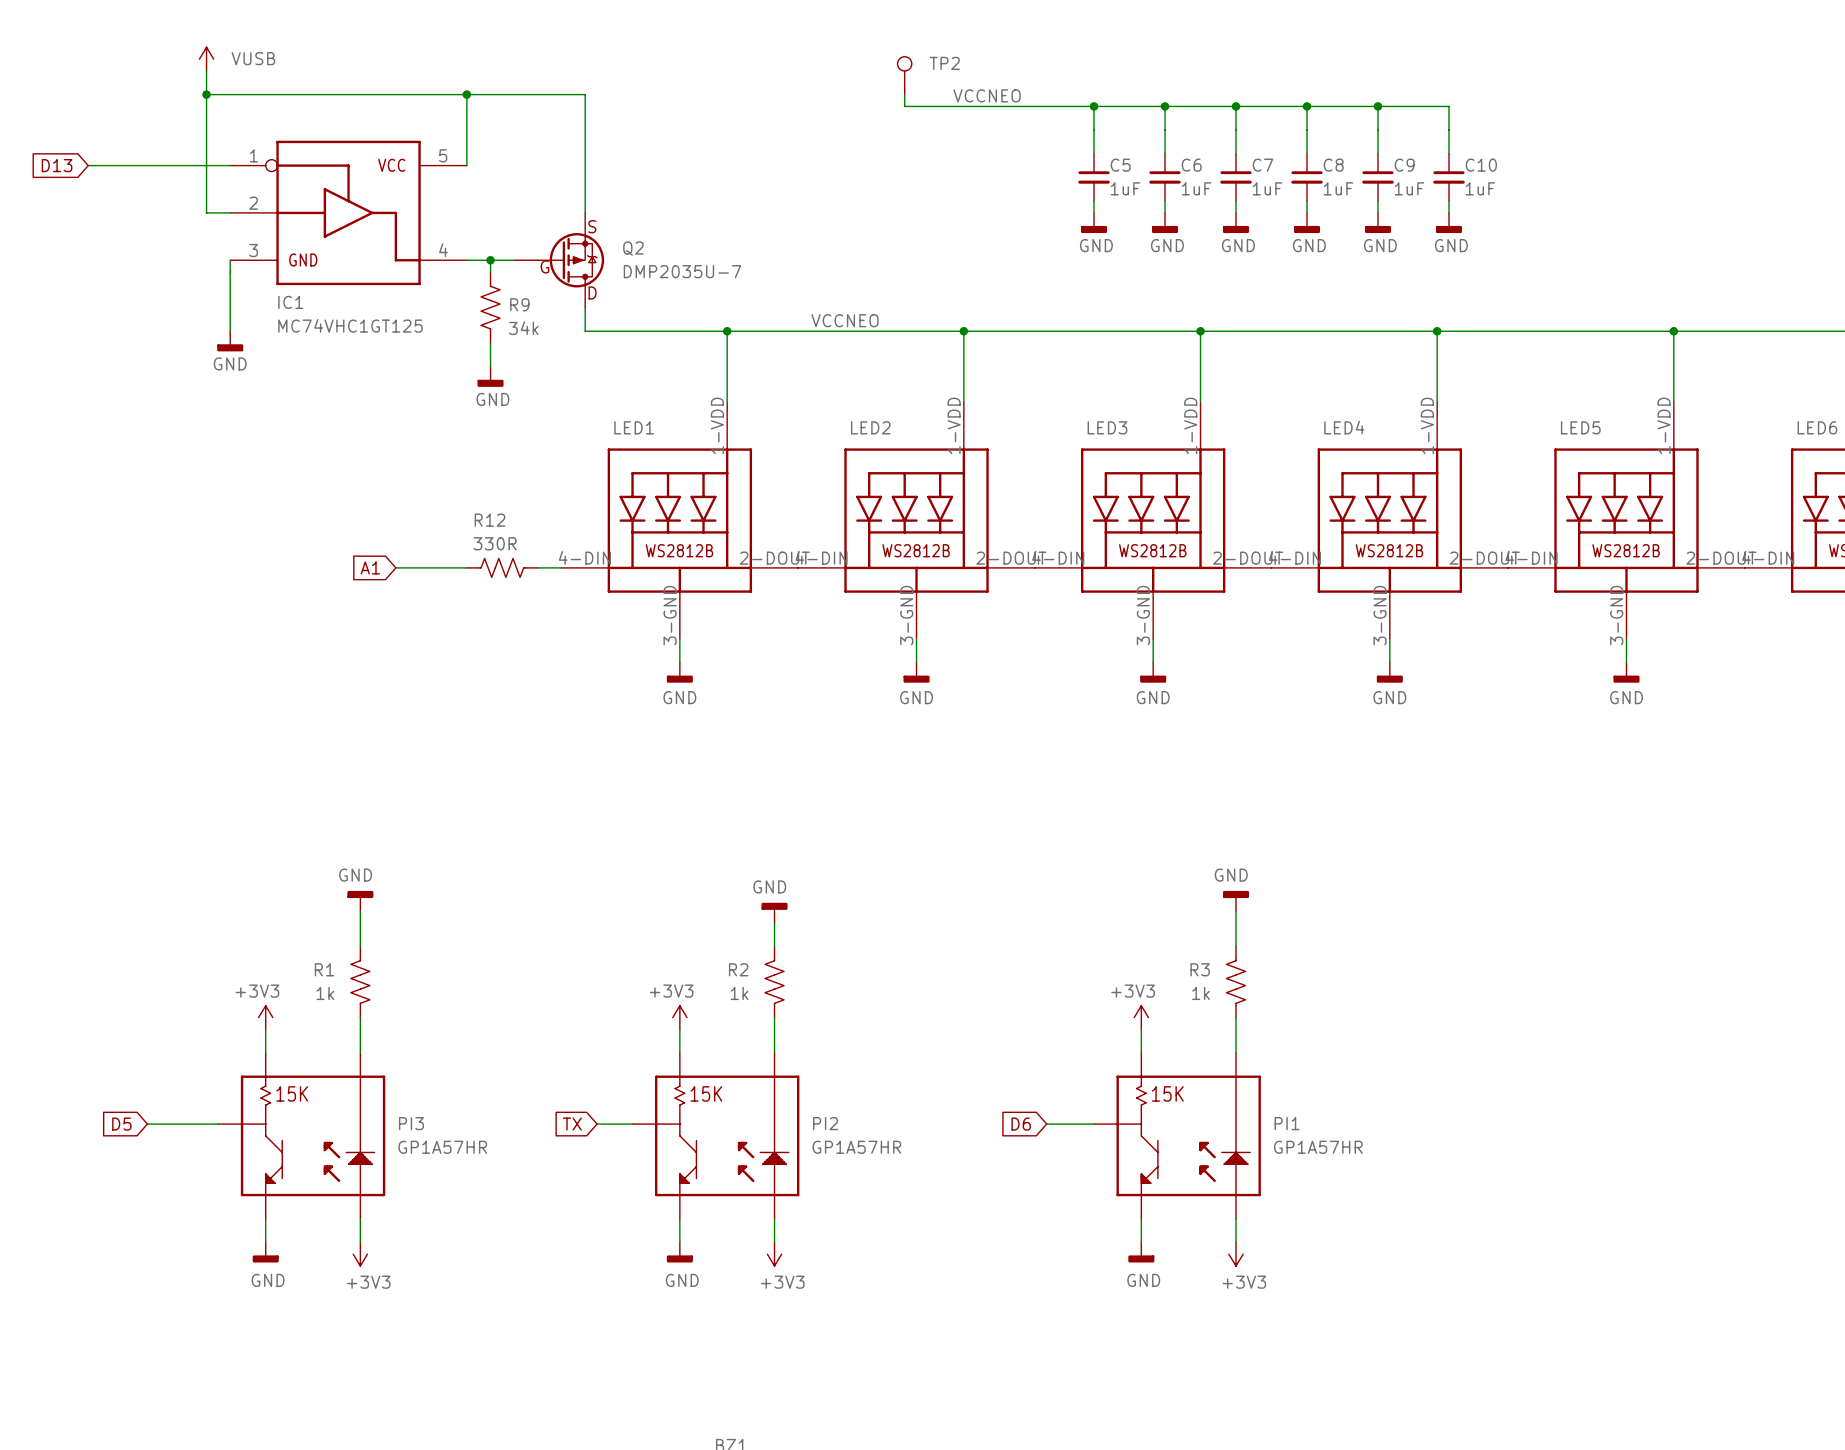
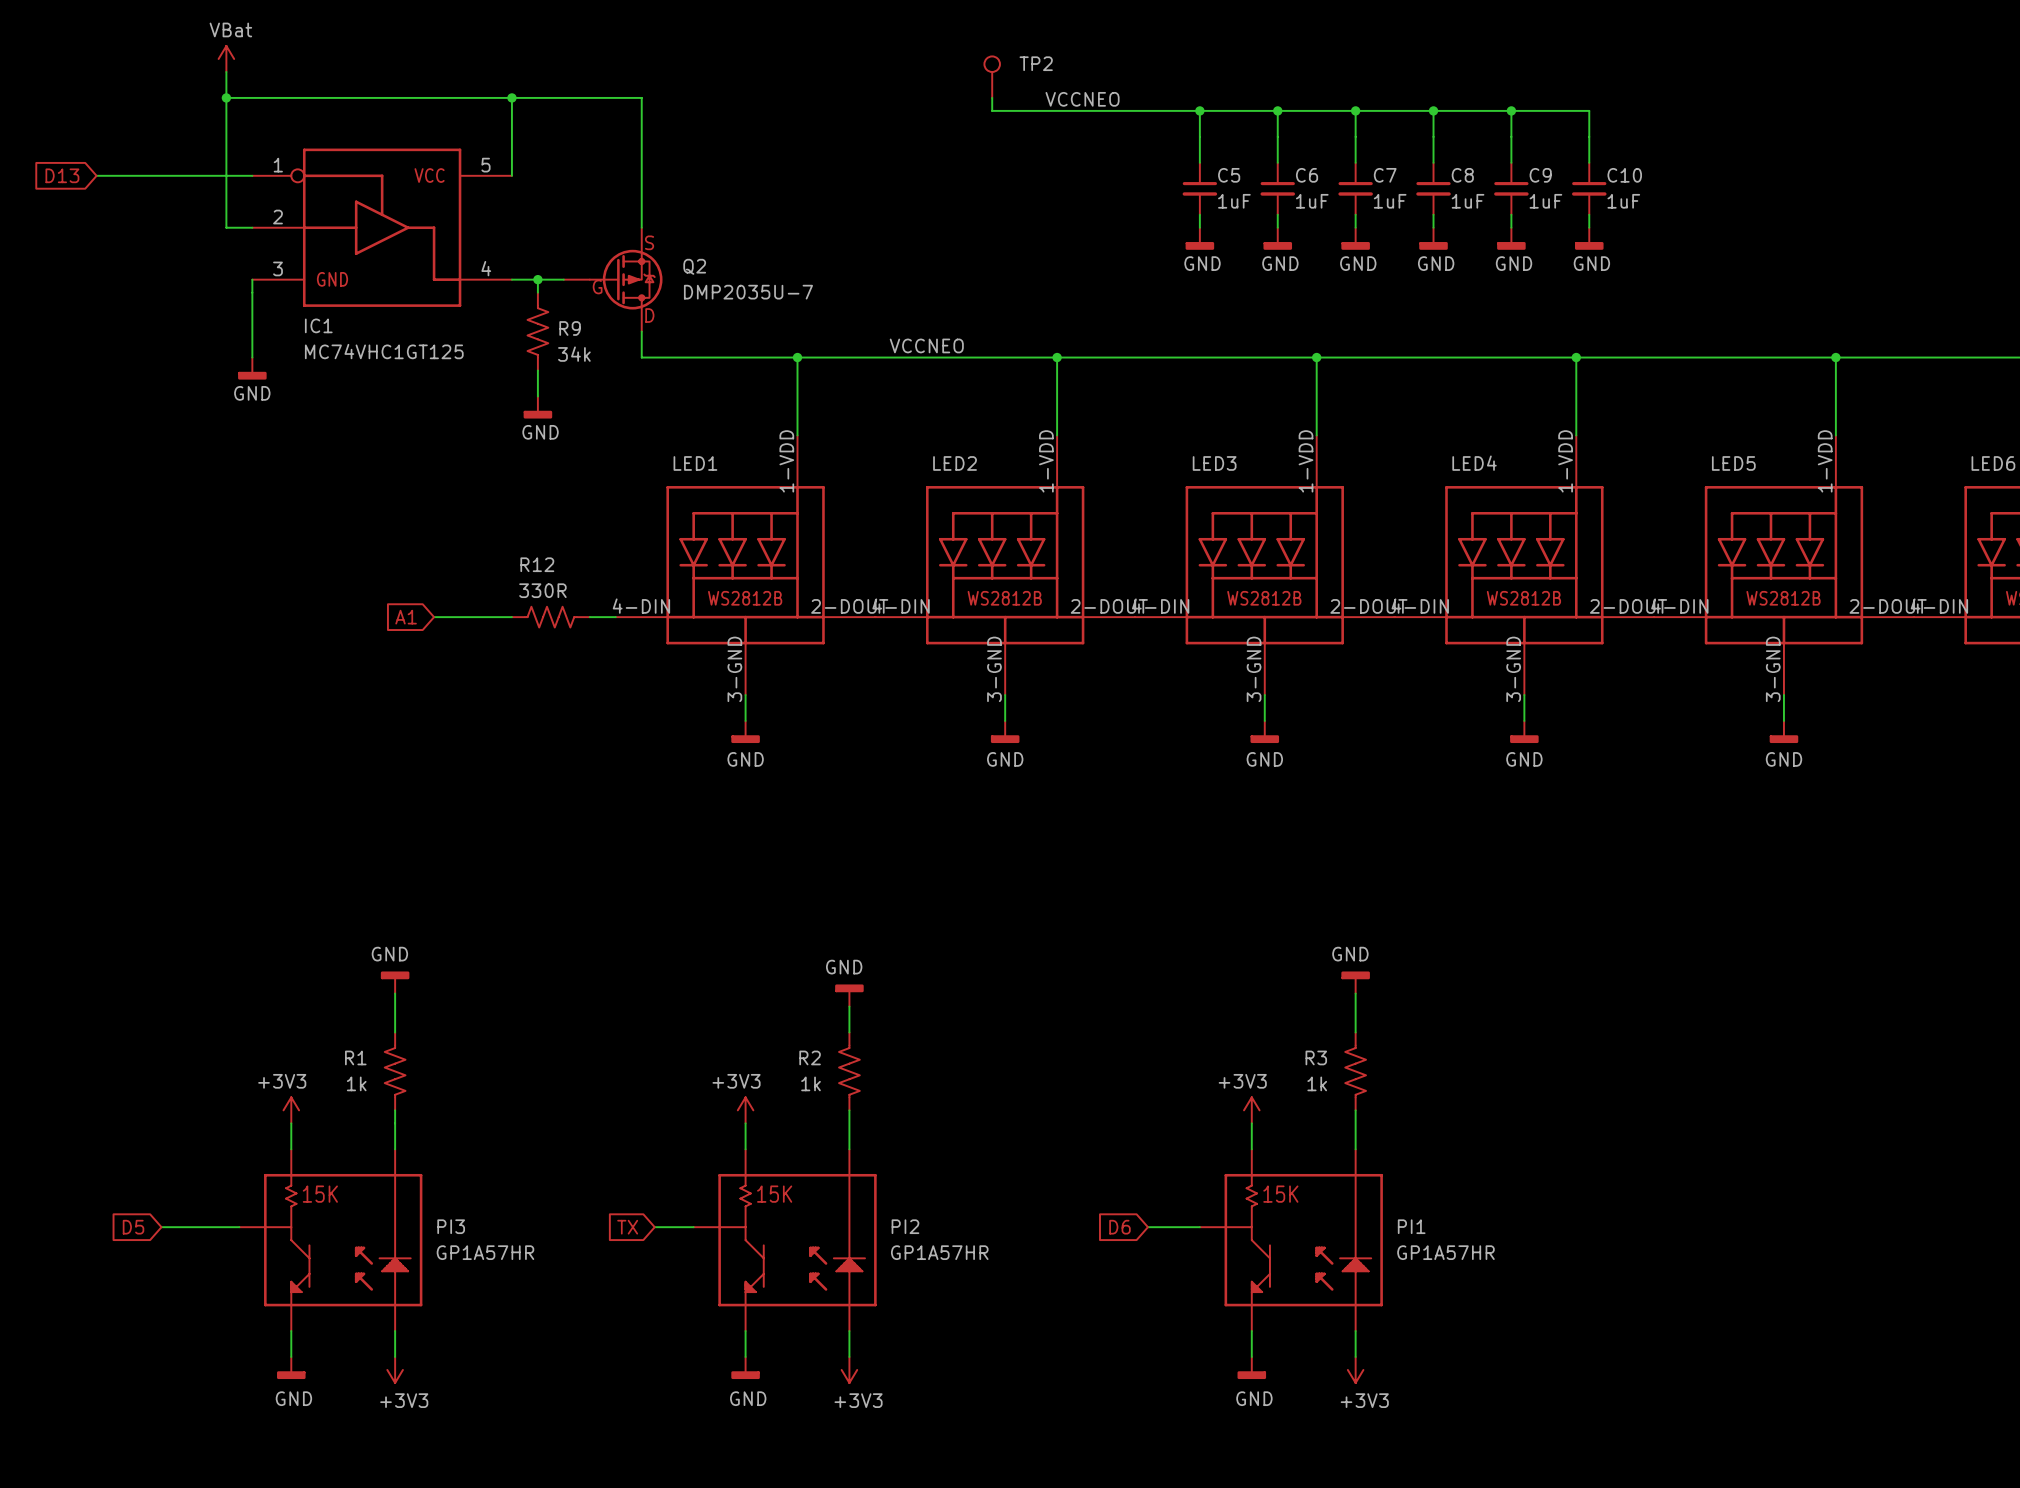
power symbol: VUSB (206, 59) -> VBat (226, 59)

